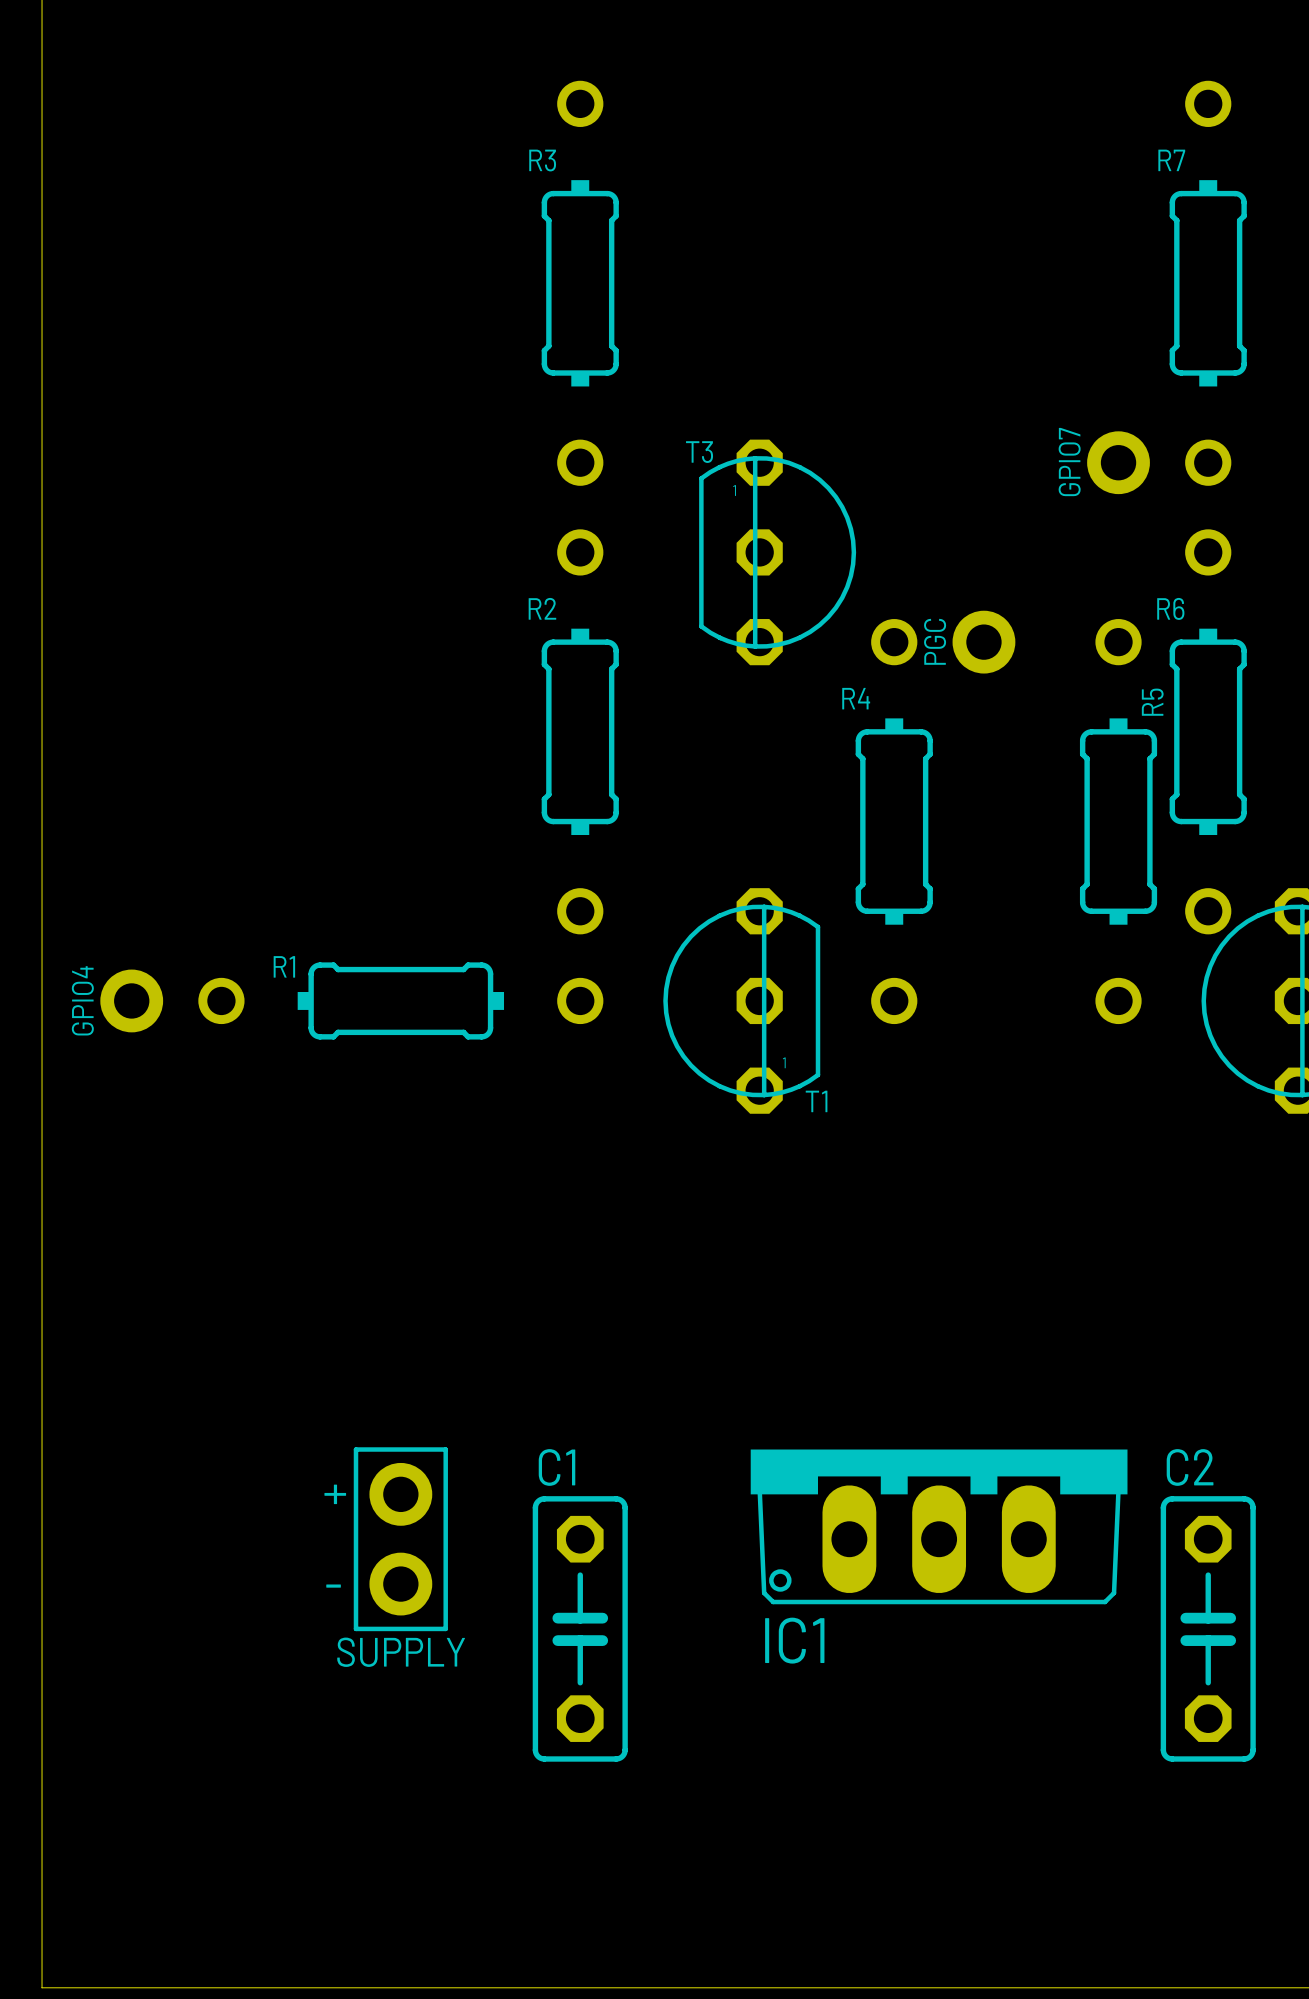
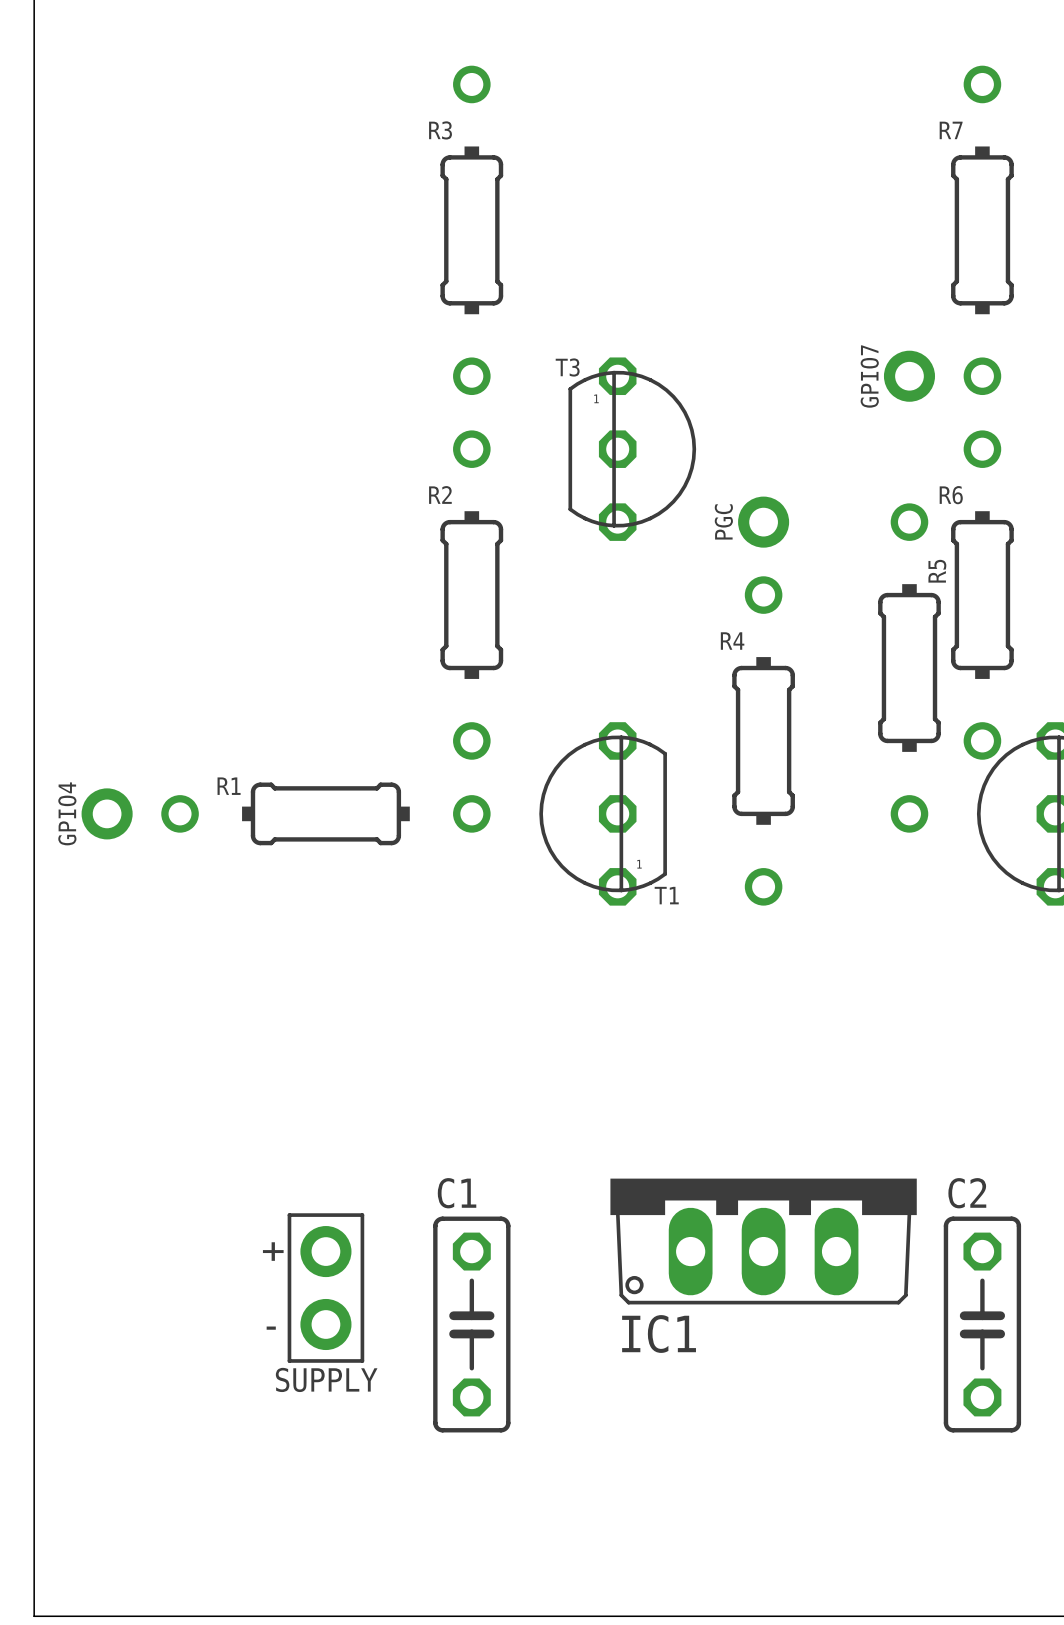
PGC position: (983, 642) -> (763, 522)
R4 position: (894, 821) -> (763, 740)
SUPPLY position: (400, 1539) -> (325, 1288)

